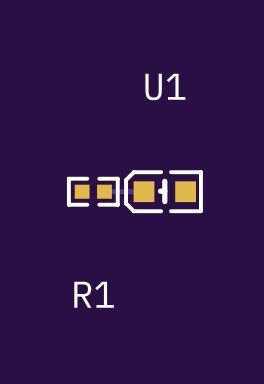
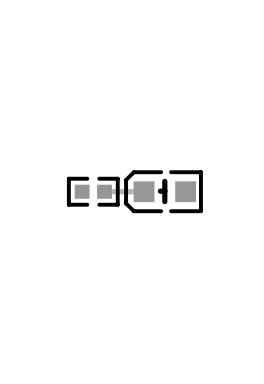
U1 name: U1 (165, 86) -> none
R1 name: R1 (94, 294) -> none

